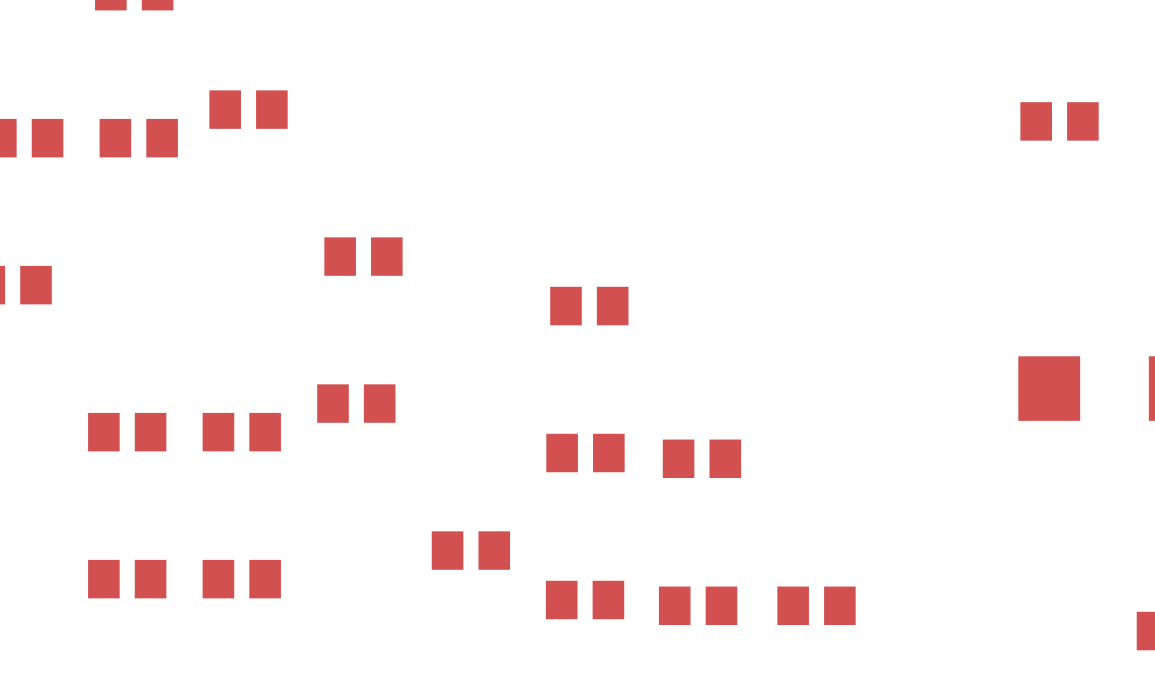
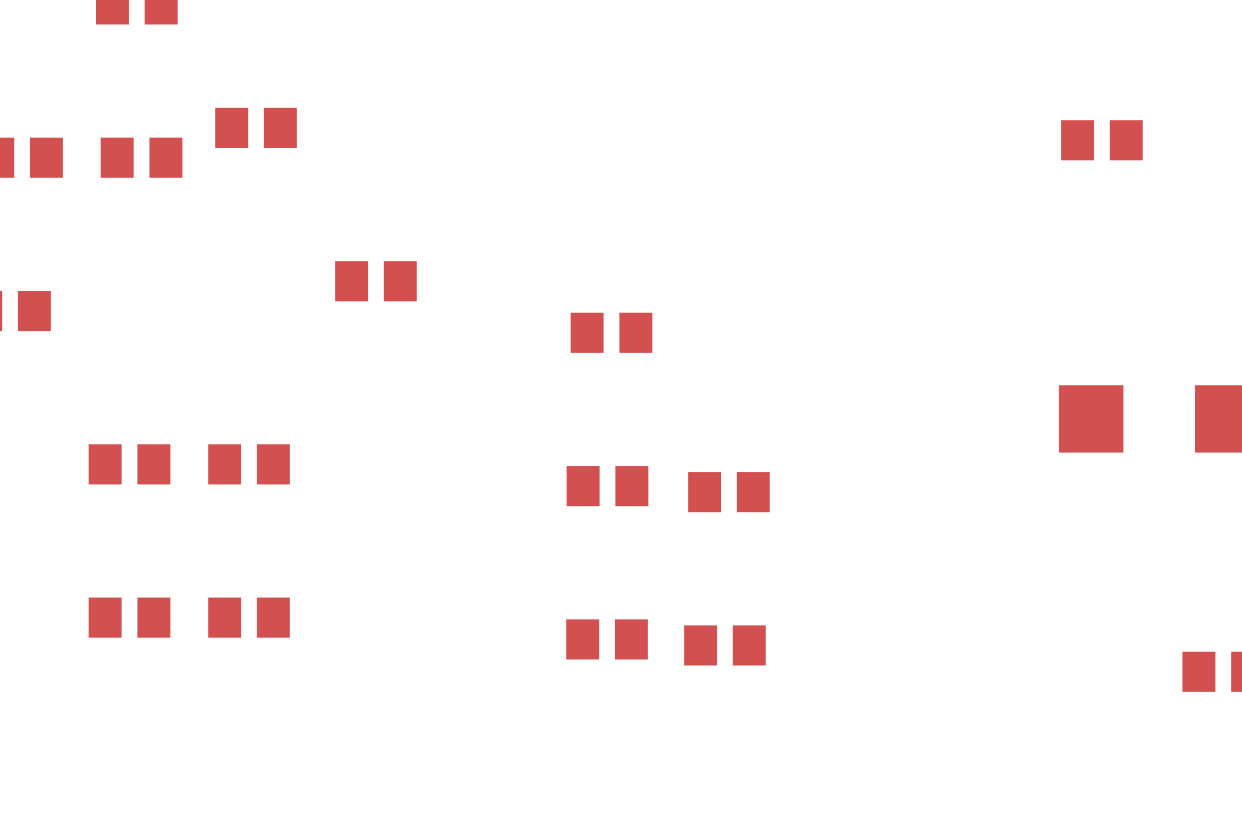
part: (356, 403) -> none
part: (470, 550) -> none
part: (816, 605) -> none

